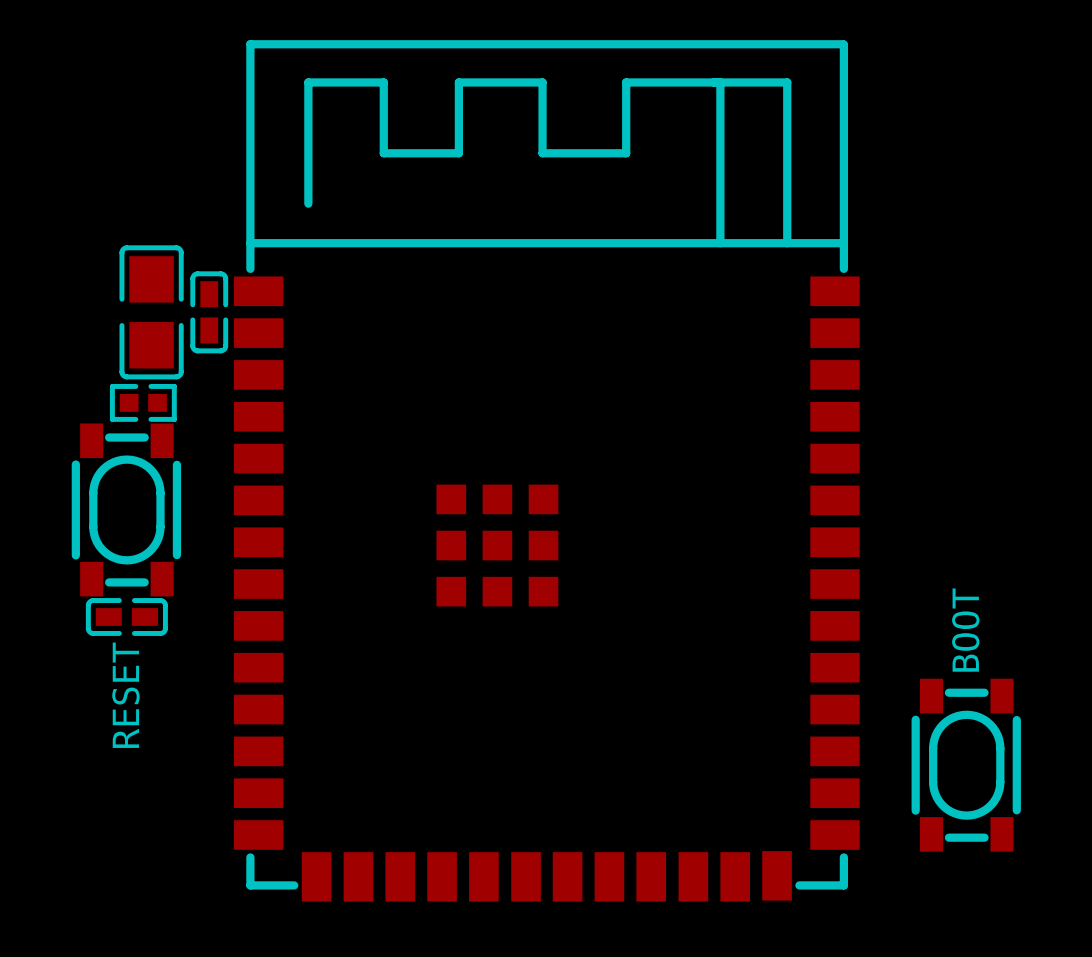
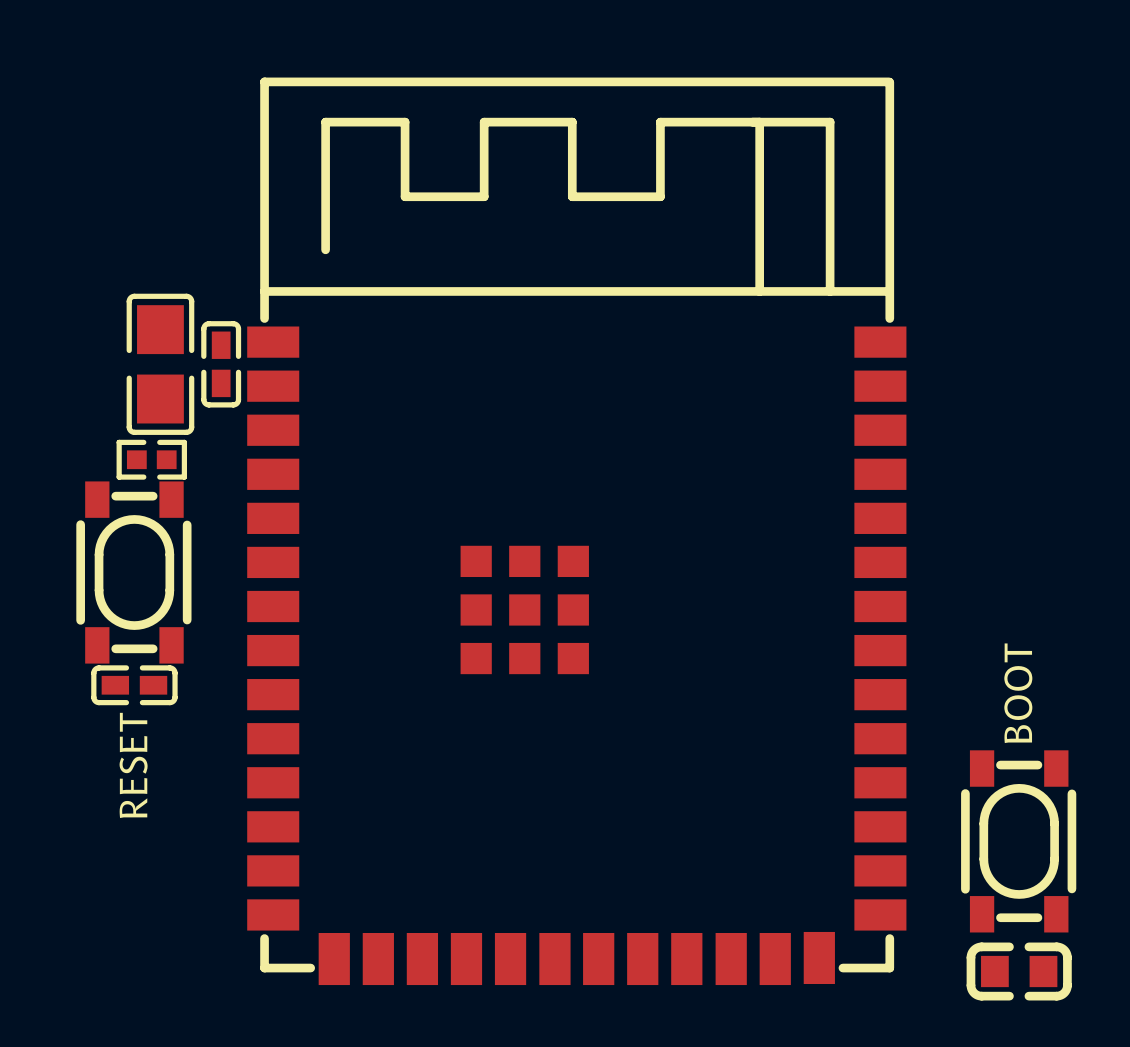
part: none -> (1019, 971)

